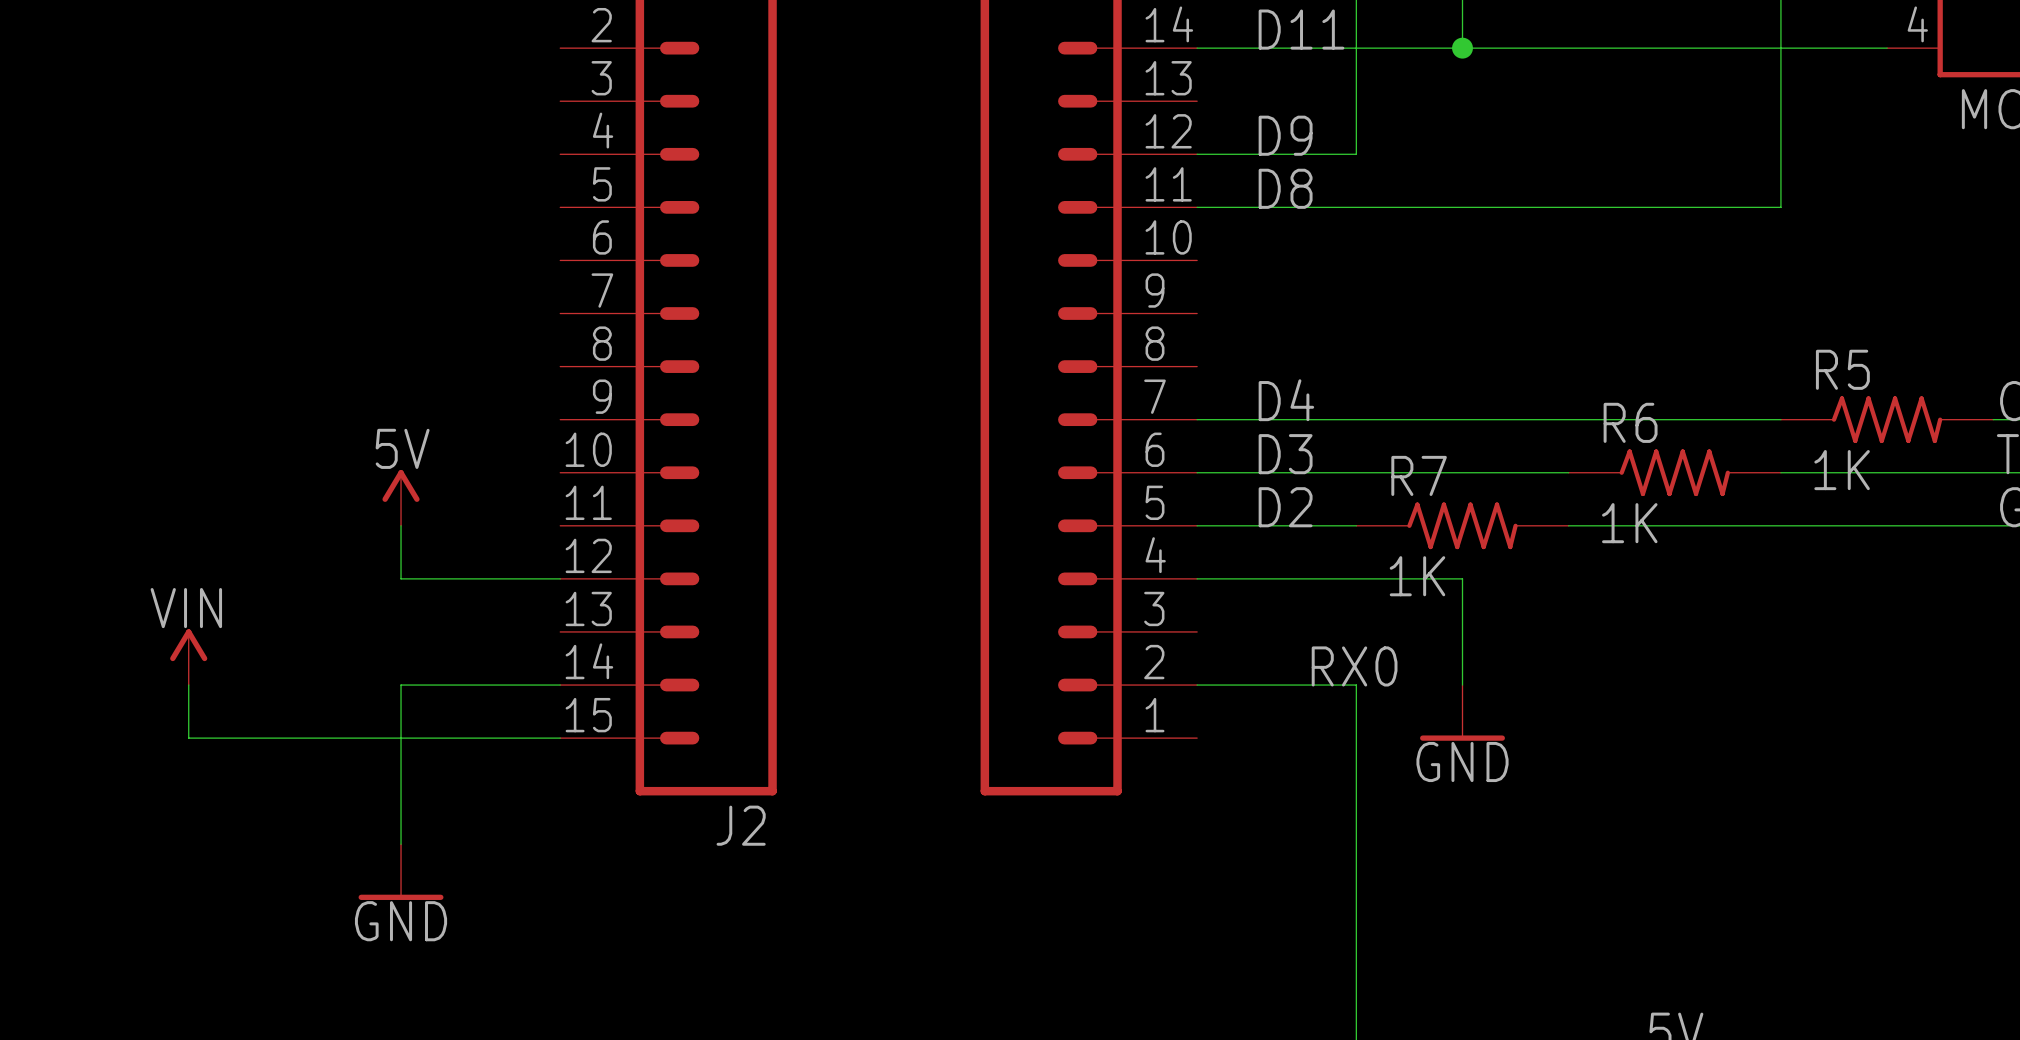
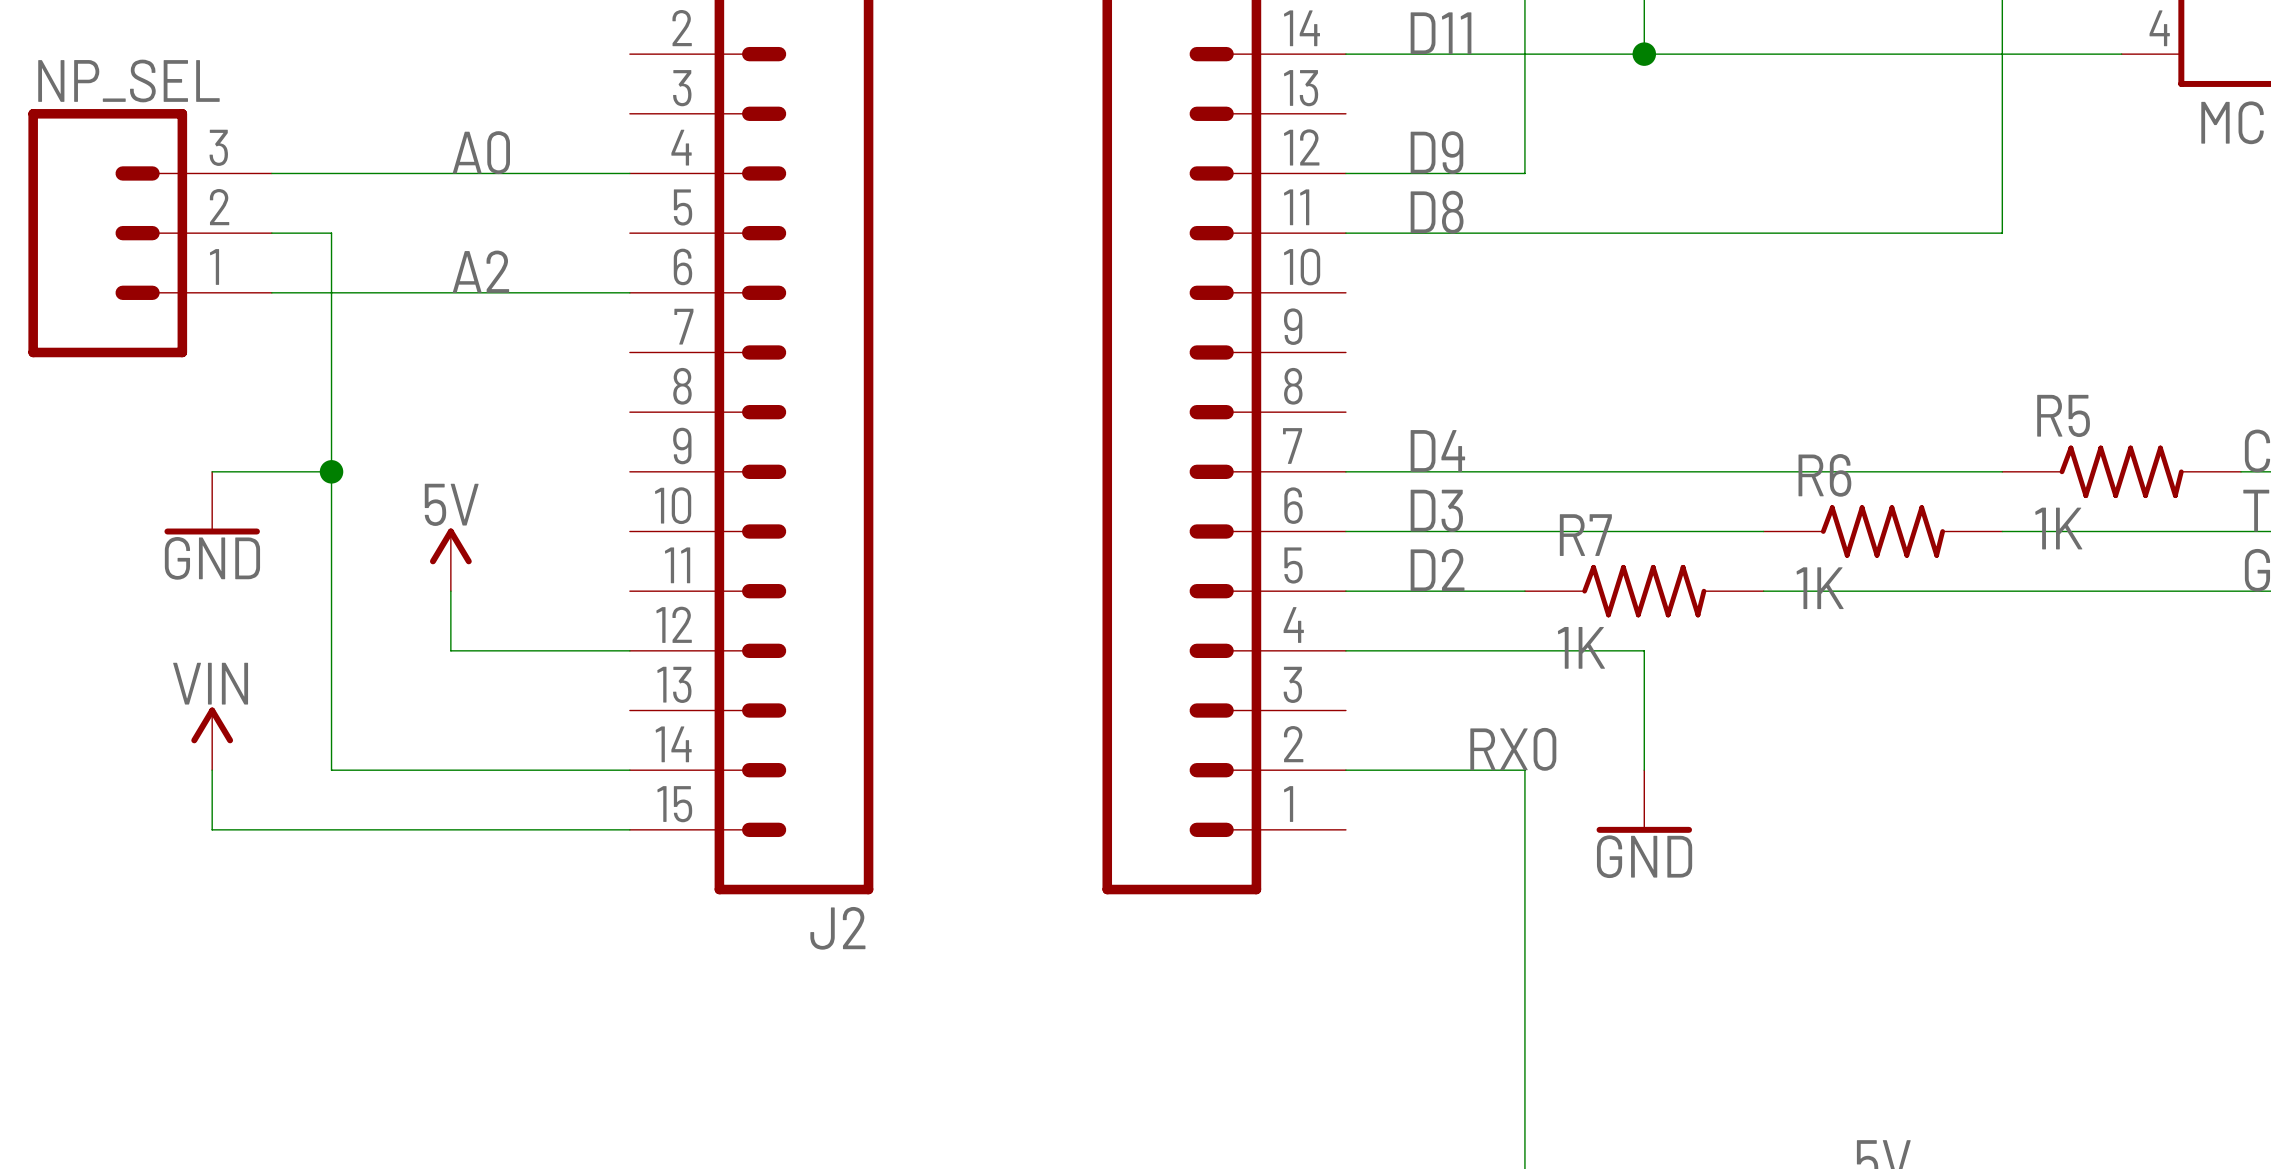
label: none -> A0 (481, 152)
wire: none -> (271, 173) (629, 173)
NP_SEL: none -> (150, 233)
label: none -> A2 (480, 271)
wire: none -> (271, 292) (629, 292)
wire: none -> (212, 471) (331, 471)
junction: none -> (331, 471)
wire: (401, 685) (401, 844) -> (450, 770) (331, 770) (331, 233) (271, 233)
power symbol position: GND (401, 872) -> GND (212, 503)

